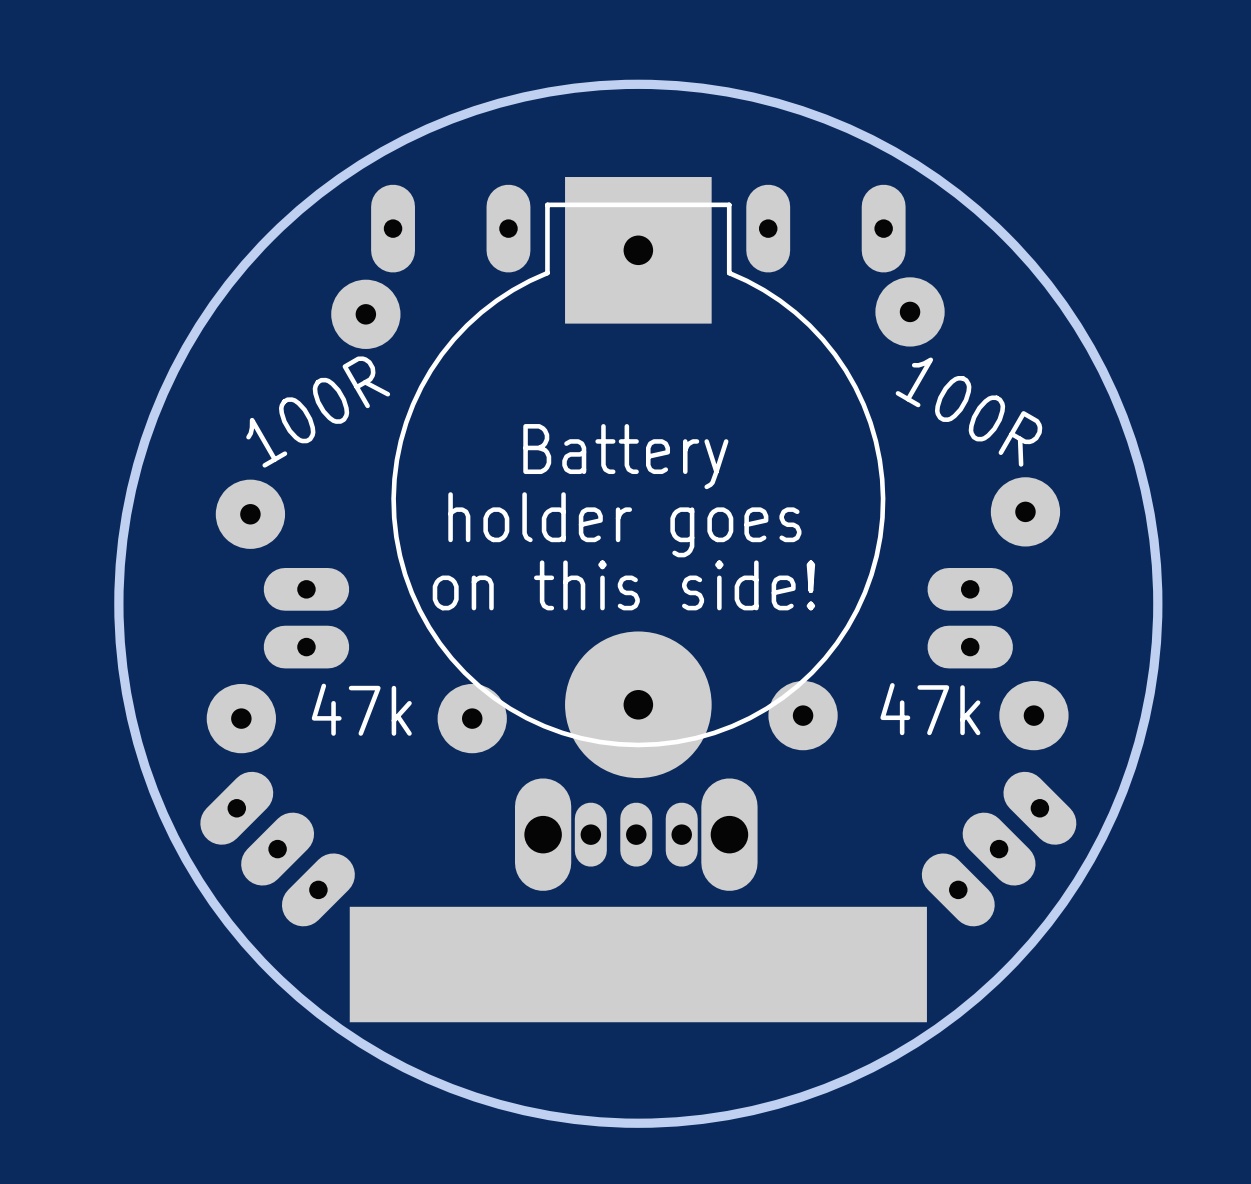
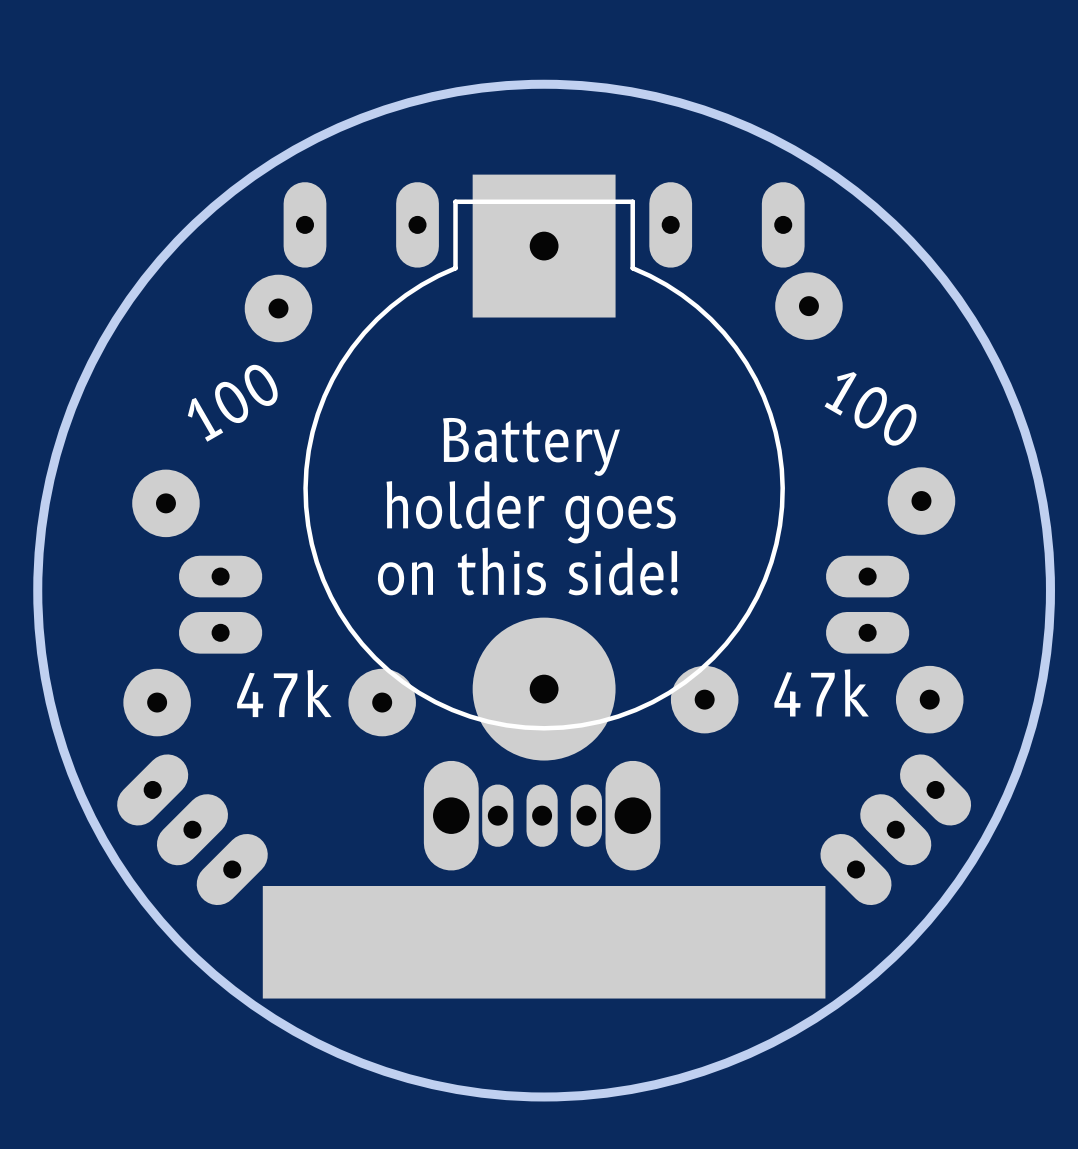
part value: 100R (318, 412) -> 100 (232, 403)
part value: 100R (968, 412) -> 100 (870, 408)

